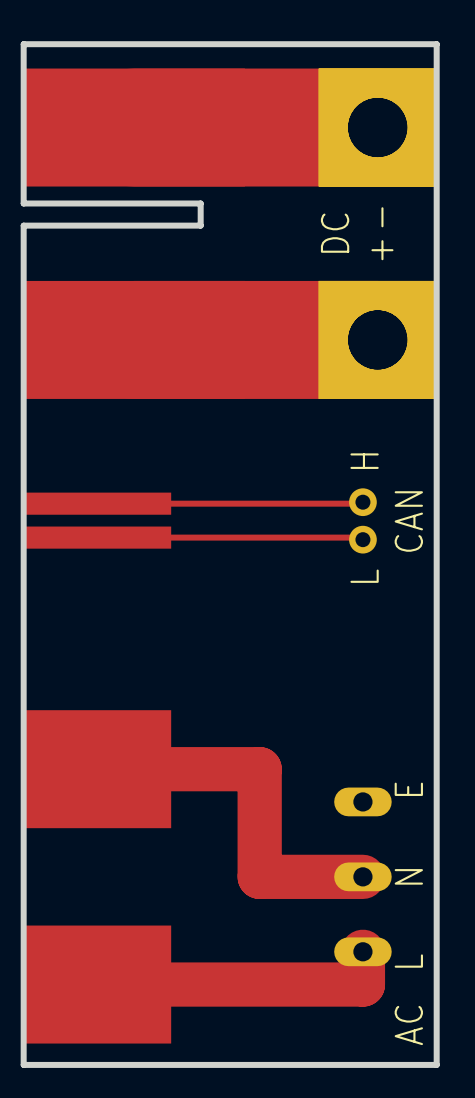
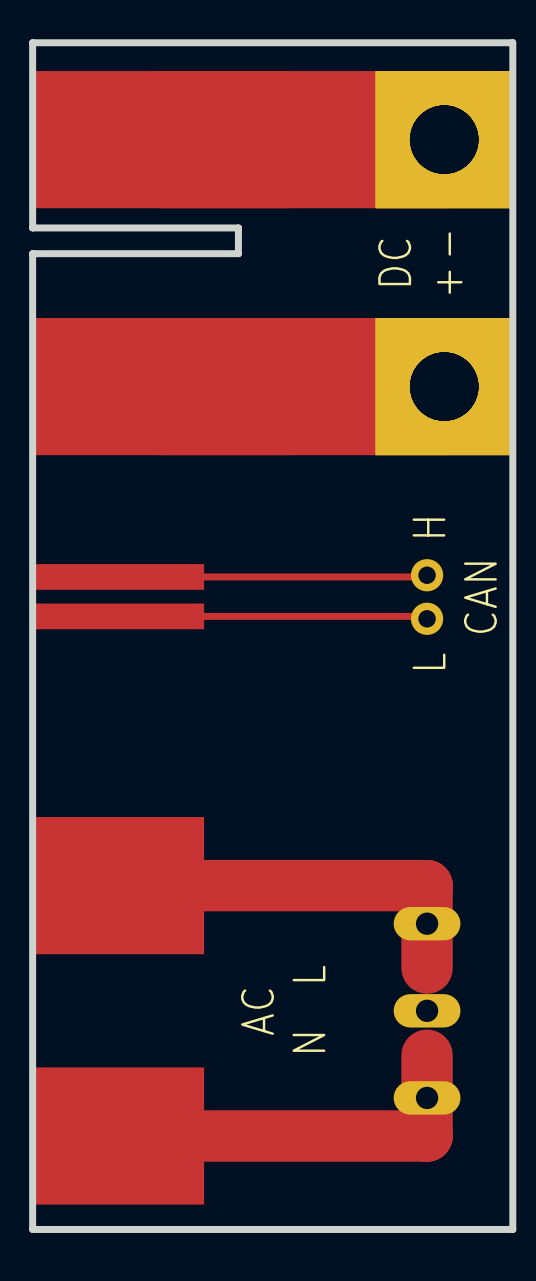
track: (259, 769) (259, 876) (362, 876) -> (307, 885) (427, 885) (427, 968)
text: E (408, 789) -> none
text position: N (408, 876) -> N (308, 1042)
track: none -> (427, 1055) (427, 1097)
text position: L (408, 961) -> L (308, 973)
text position: AC (408, 1025) -> AC (257, 1012)

